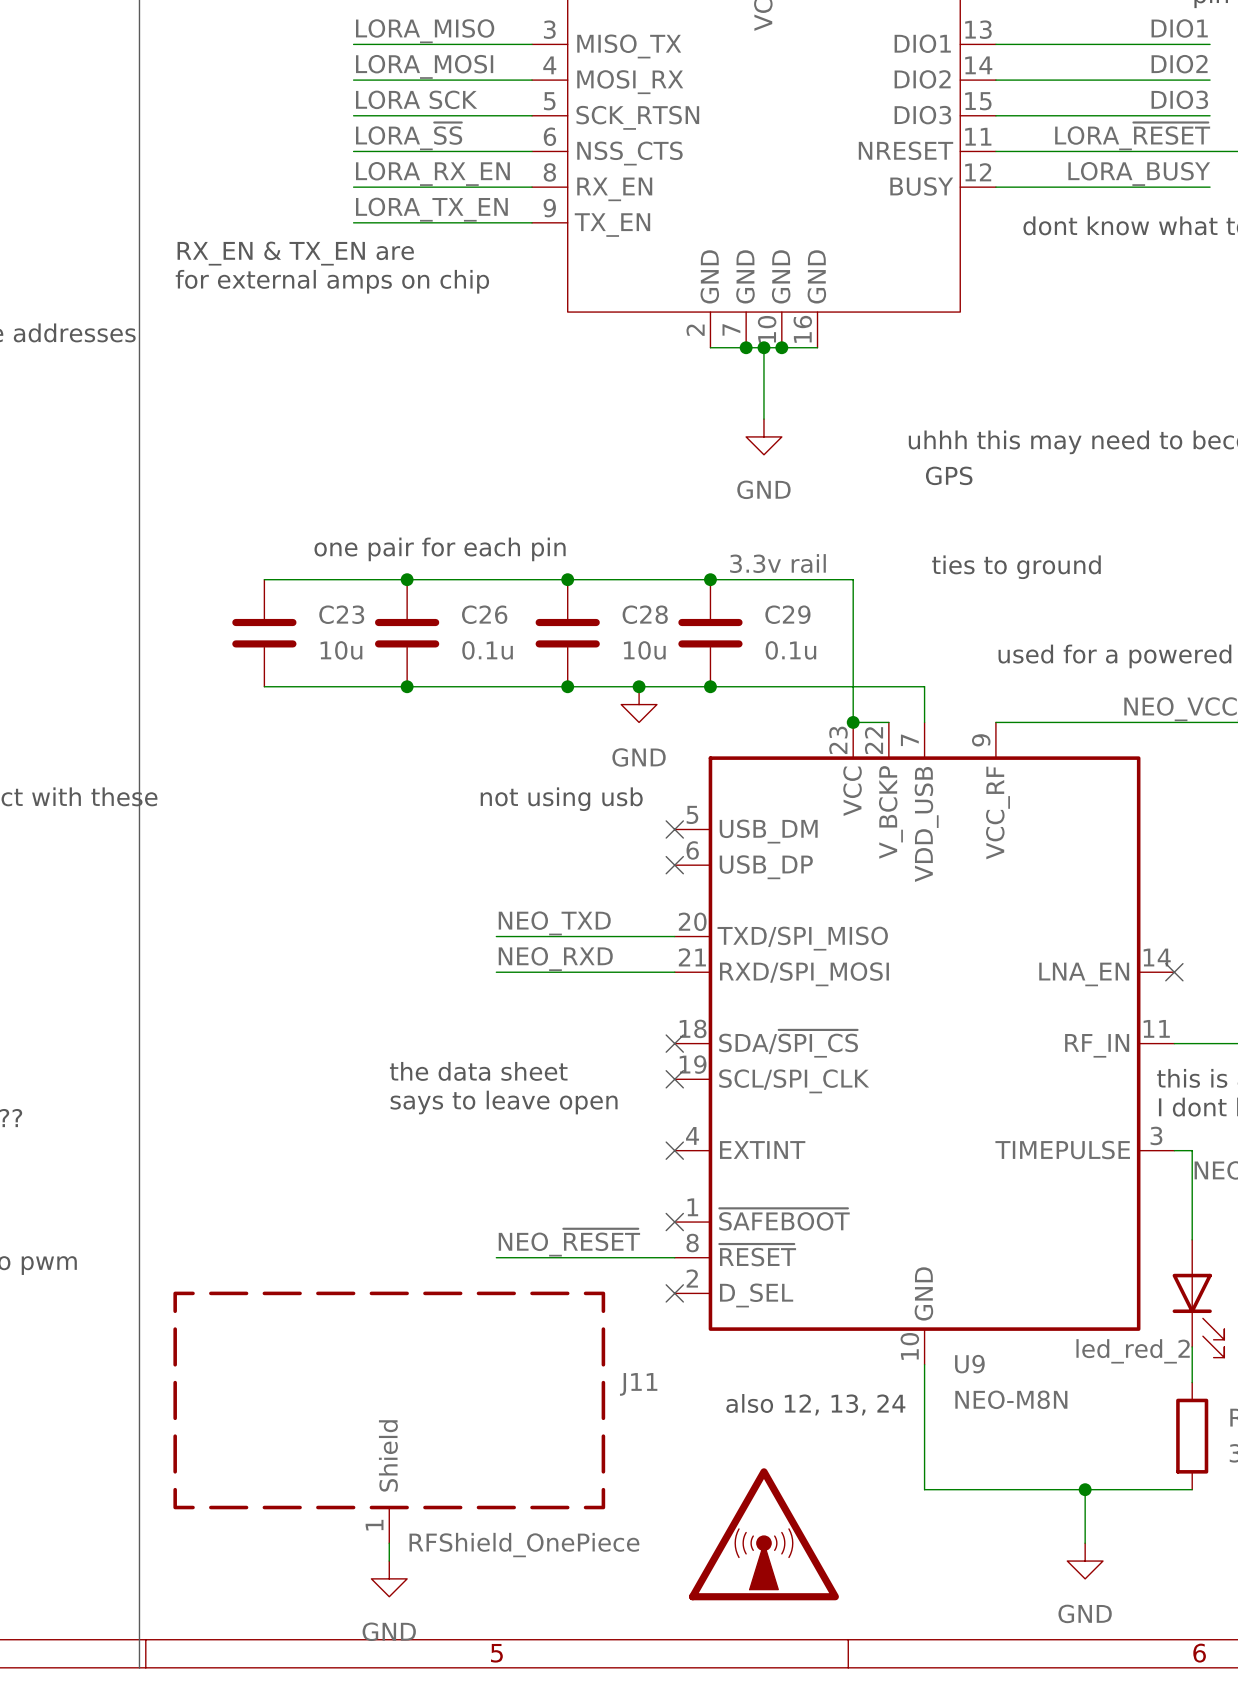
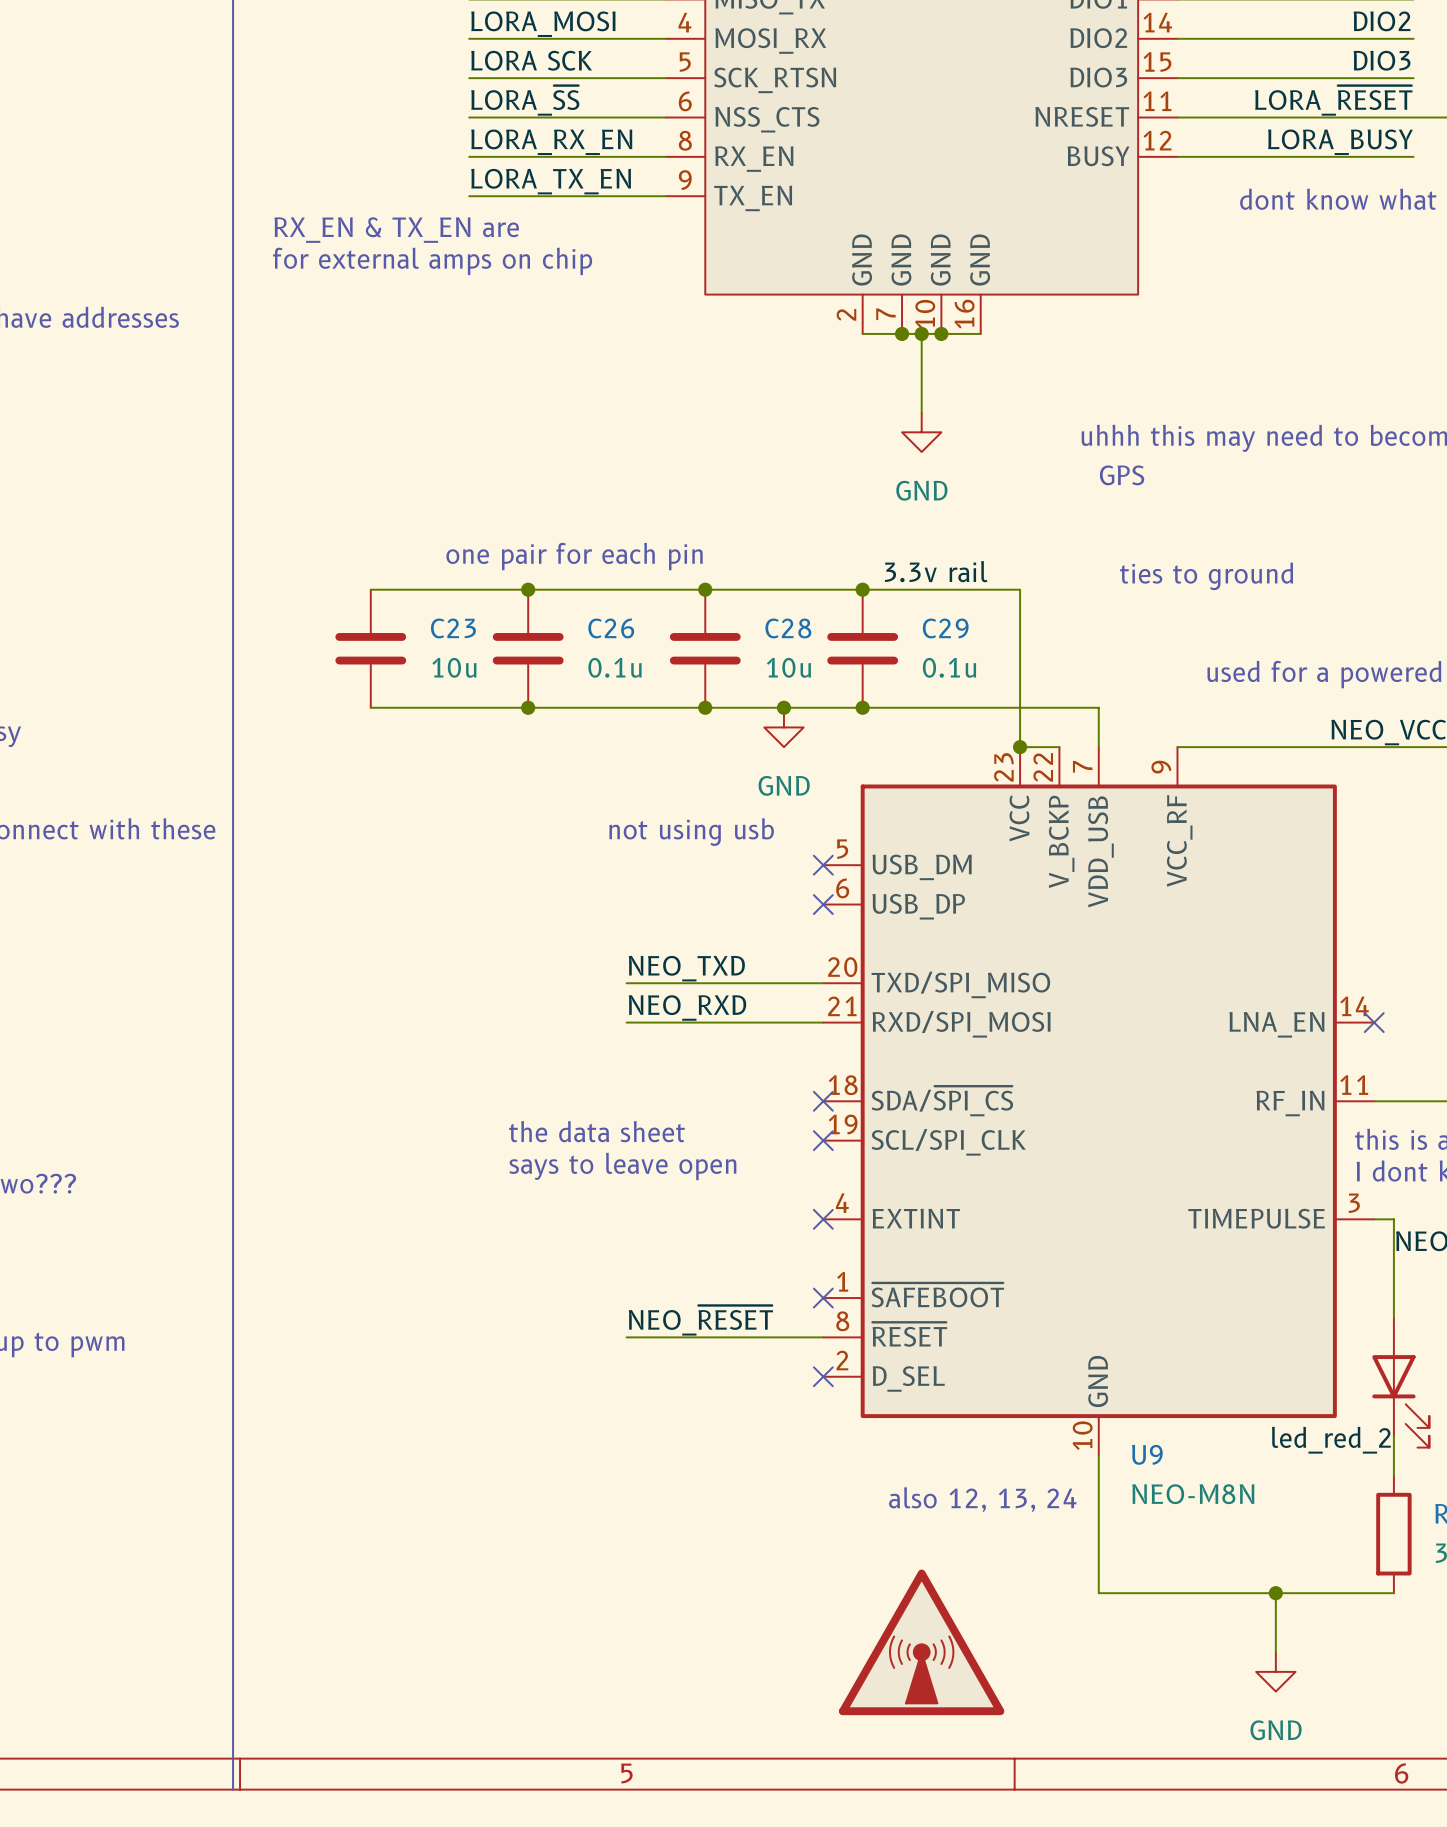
J11: RFShield_OnePiece (389, 1417) -> none
wire: (389, 1543) (389, 1561) -> none
power symbol: GND (389, 1578) -> none

